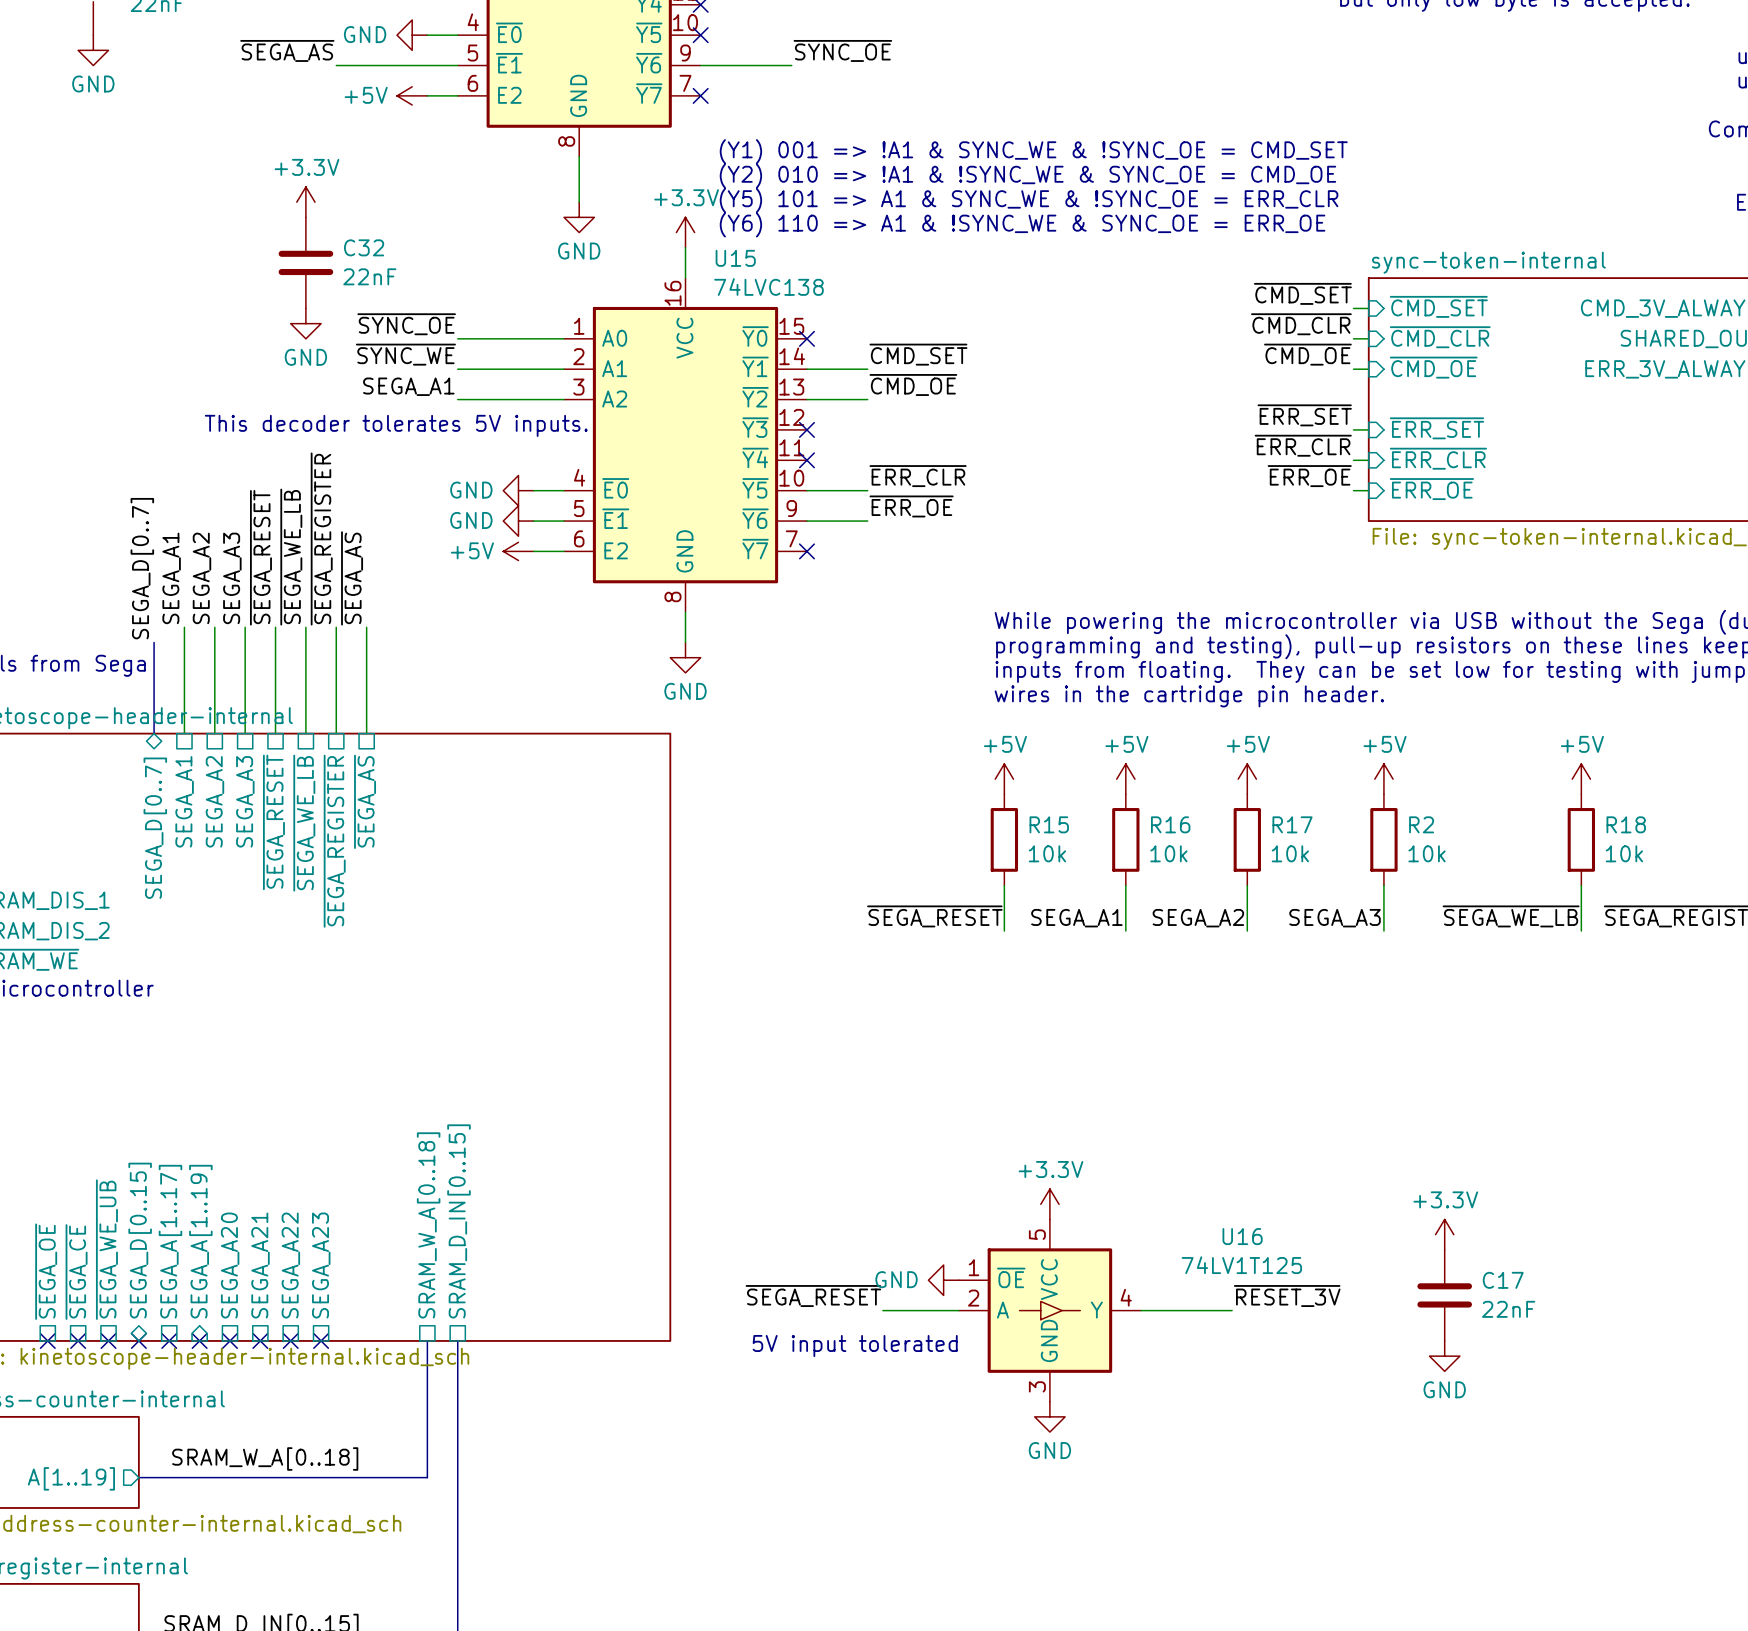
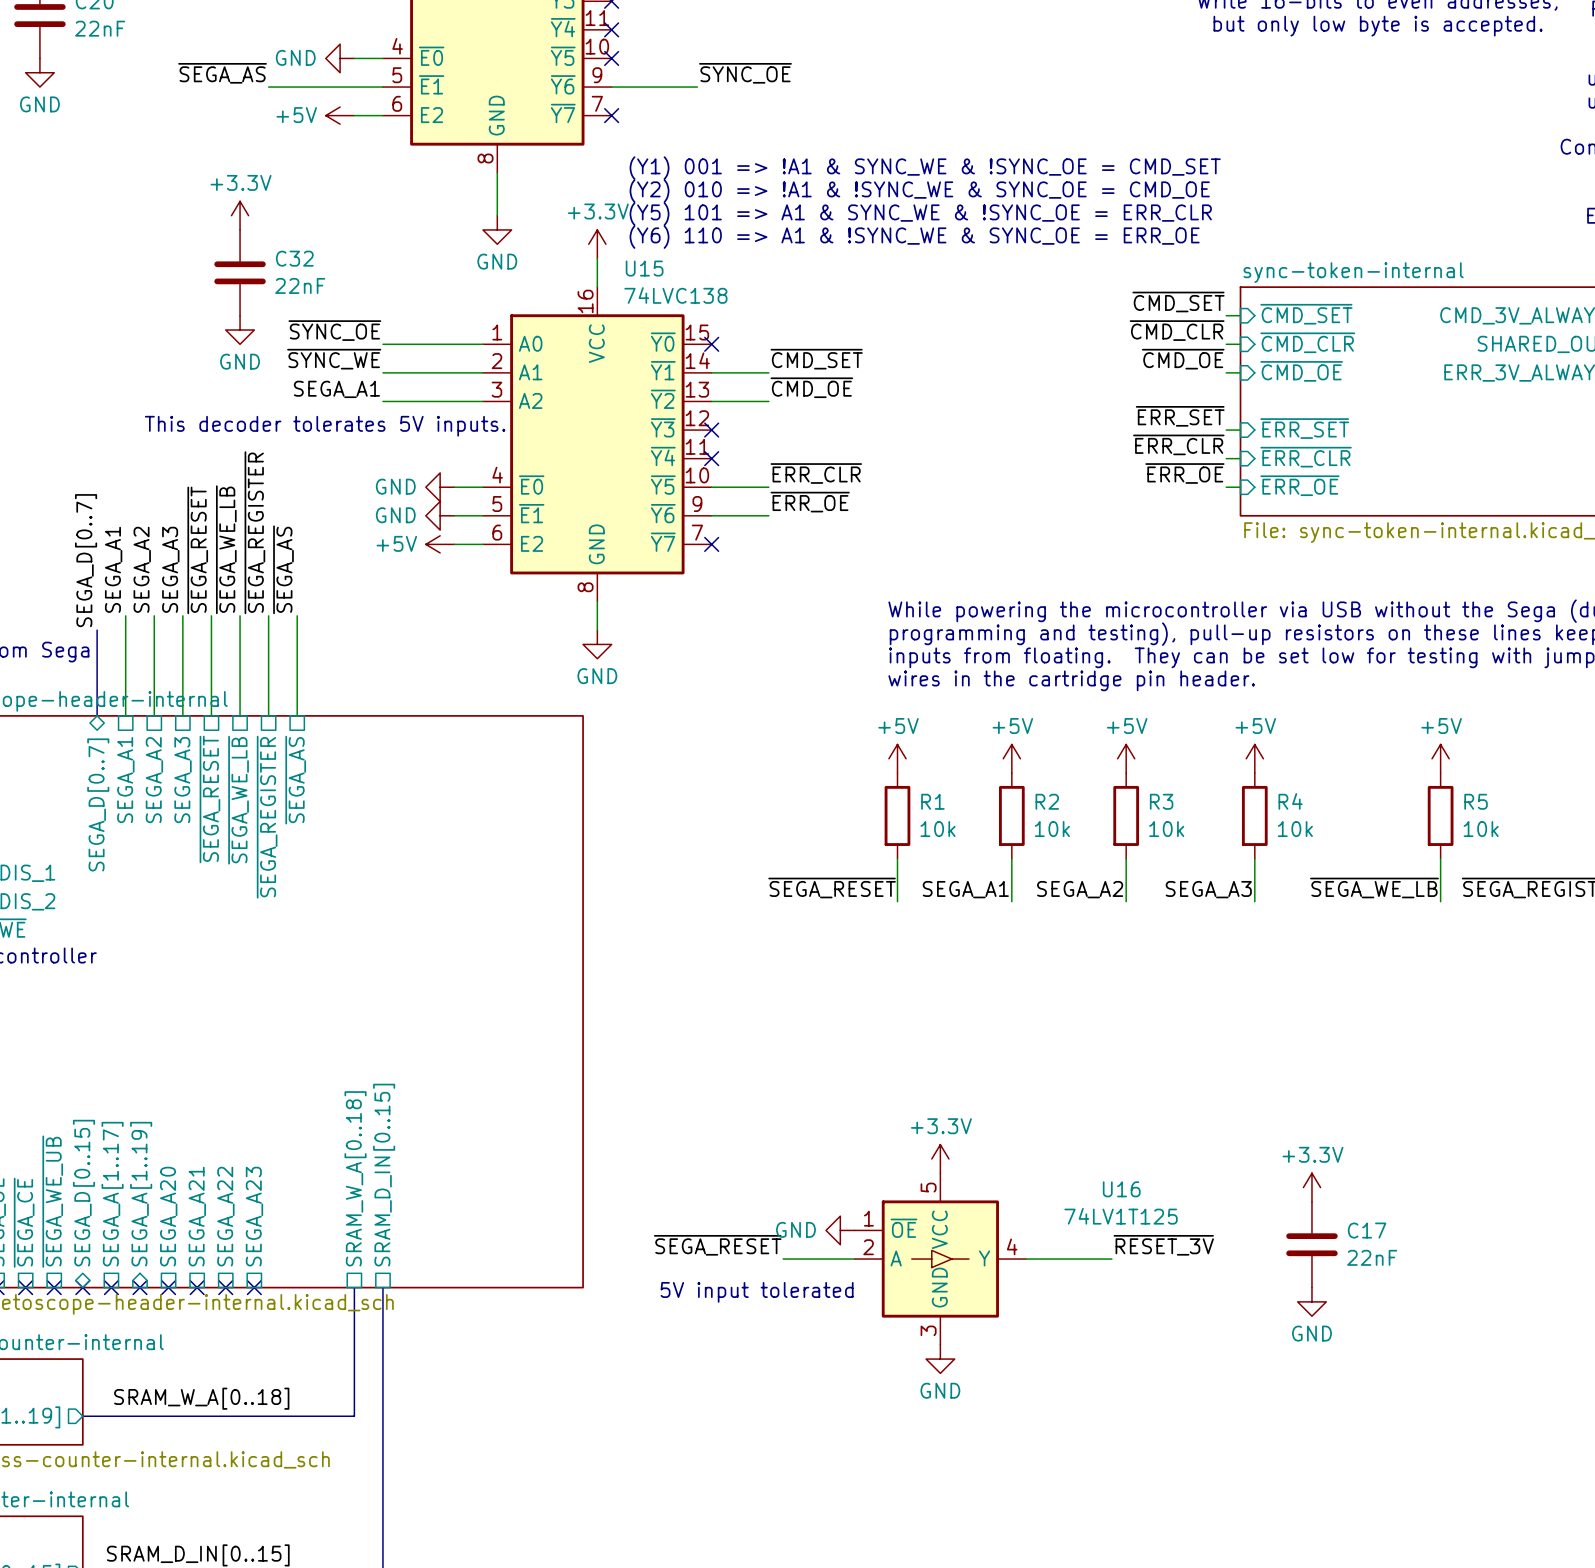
R15 name: R15 (1049, 824) -> R1 (932, 801)
R16 name: R16 (1170, 824) -> R2 (1047, 801)
R17 name: R17 (1292, 824) -> R3 (1161, 801)
R2 name: R2 (1421, 824) -> R4 (1290, 801)
R18 name: R18 (1626, 824) -> R5 (1476, 801)

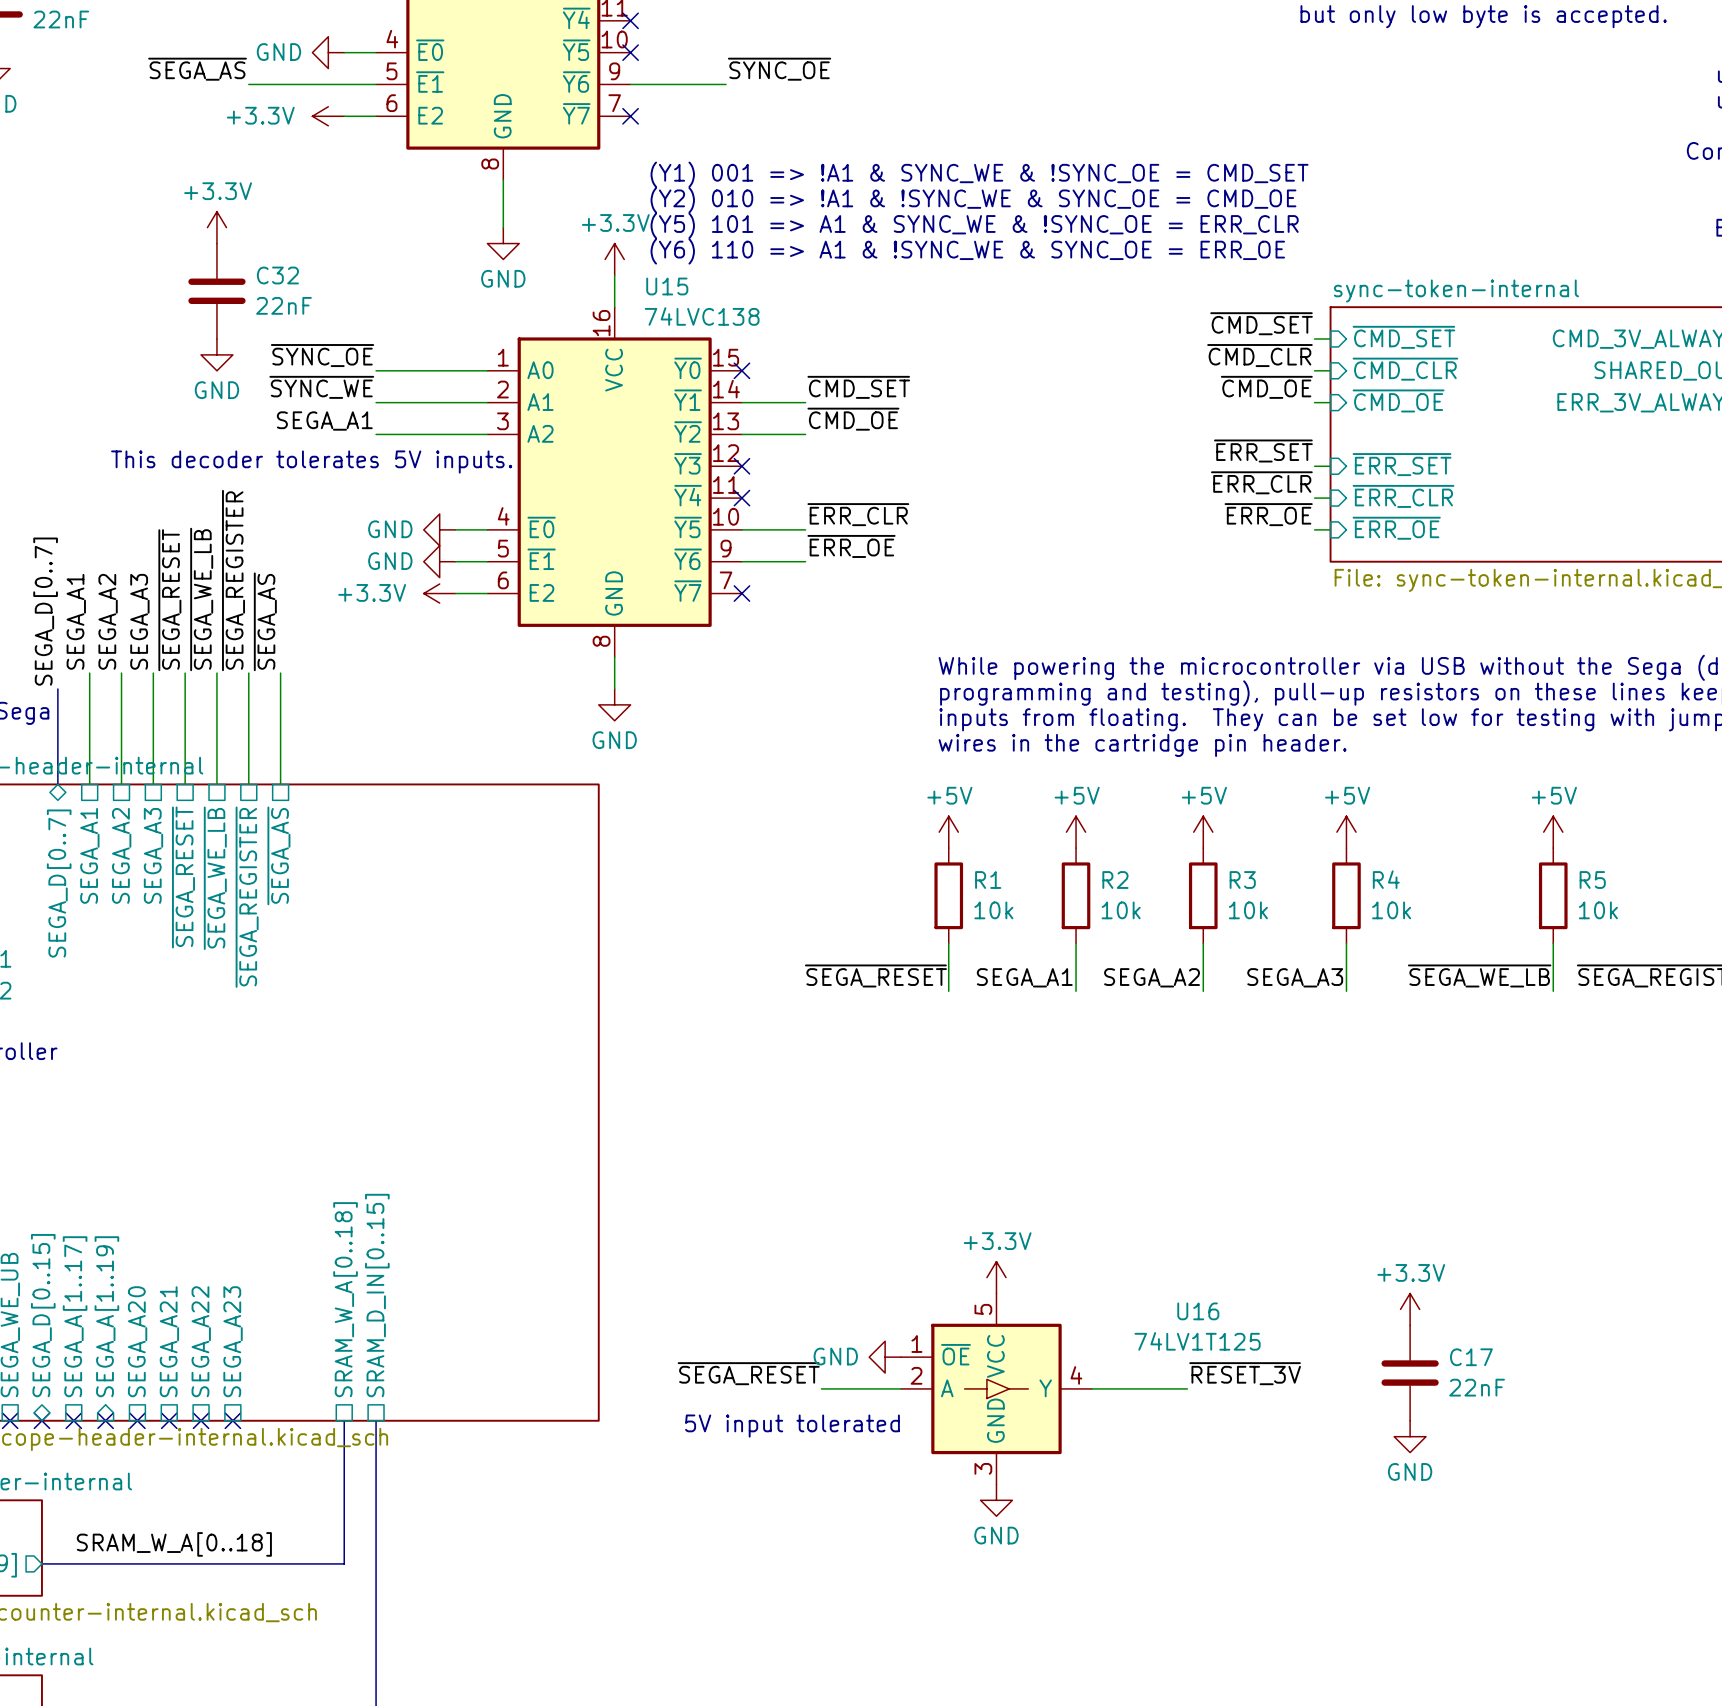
power symbol: +5V (340, 115) -> +3.3V (328, 116)
power symbol: +5V (440, 544) -> +3.3V (439, 593)

